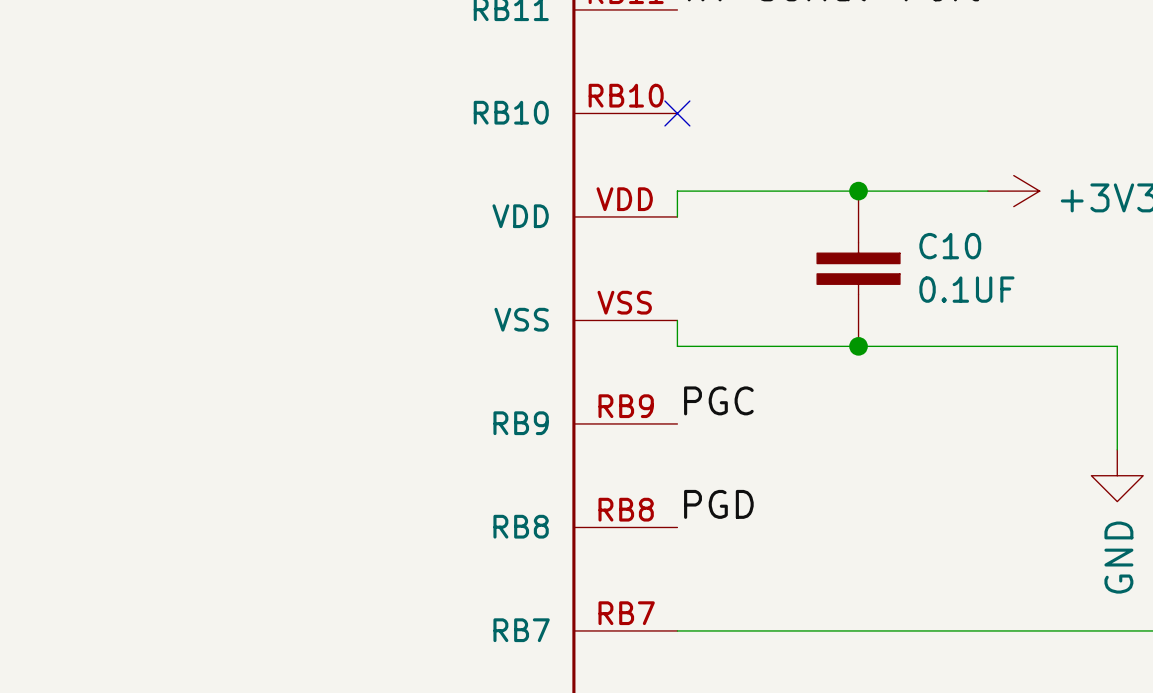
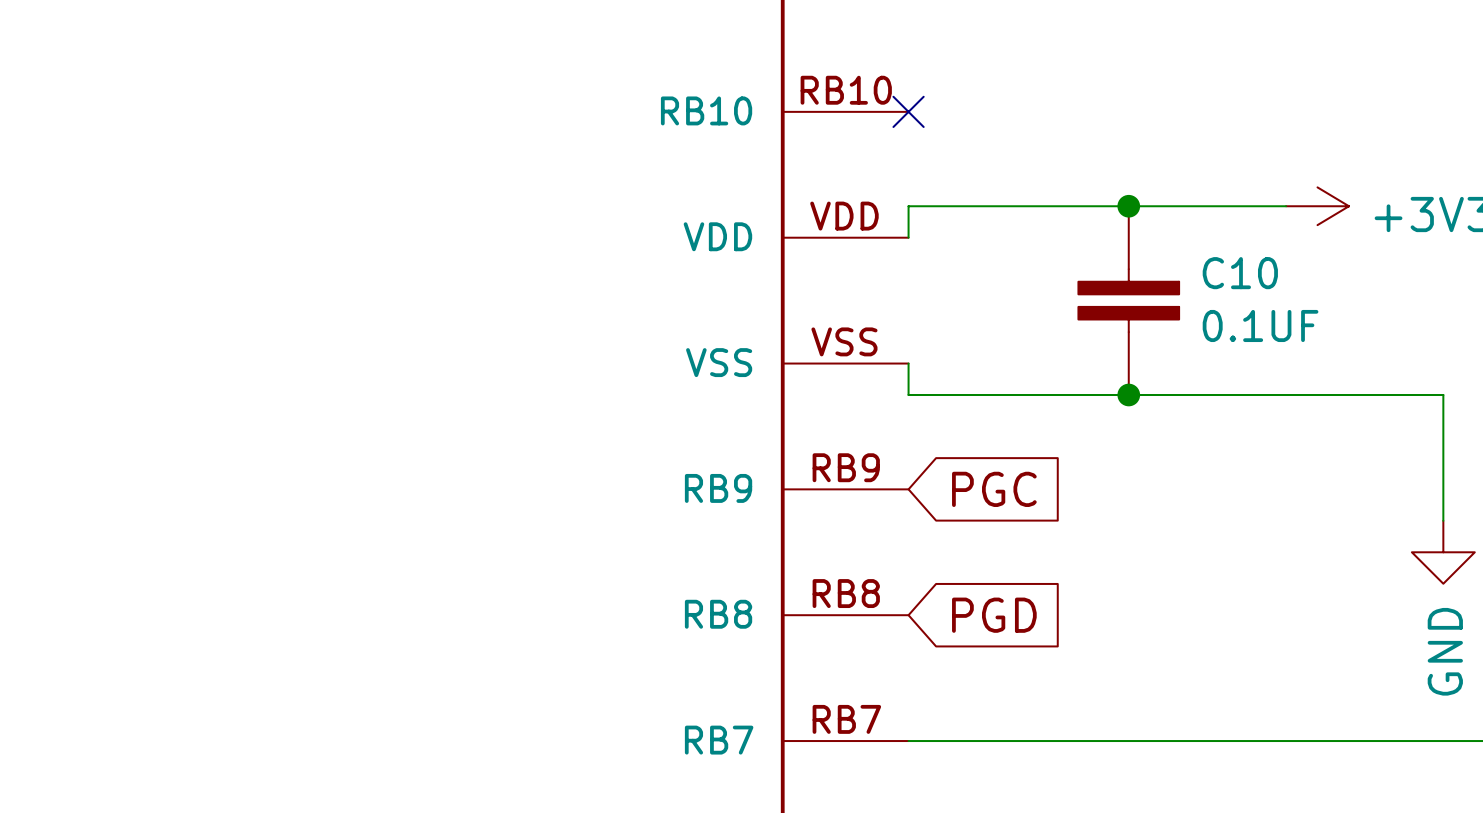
label: PGC (718, 400) -> none
global label: none -> PGC (994, 489)
label: PGD (718, 504) -> none
global label: none -> PGD (994, 615)

